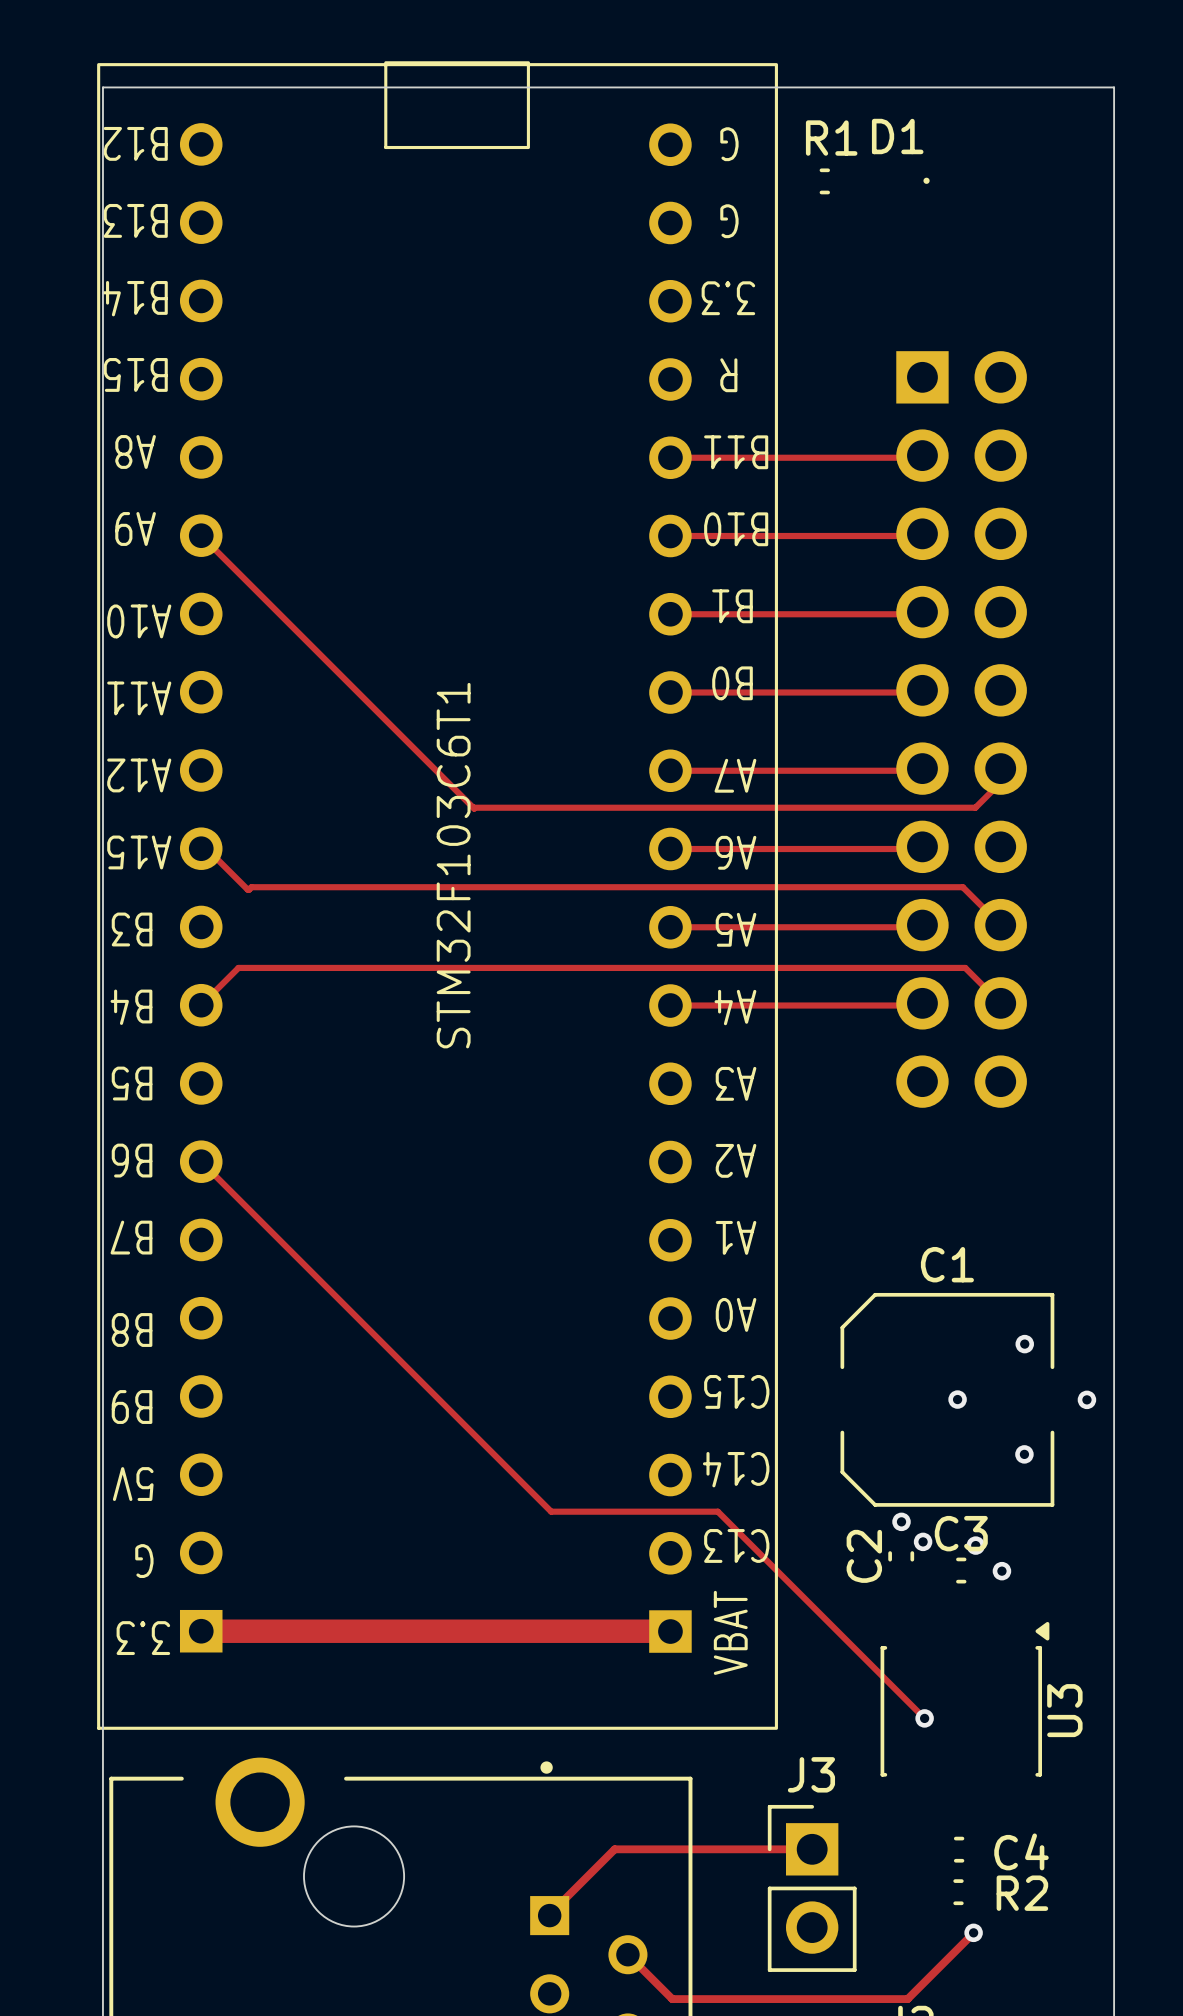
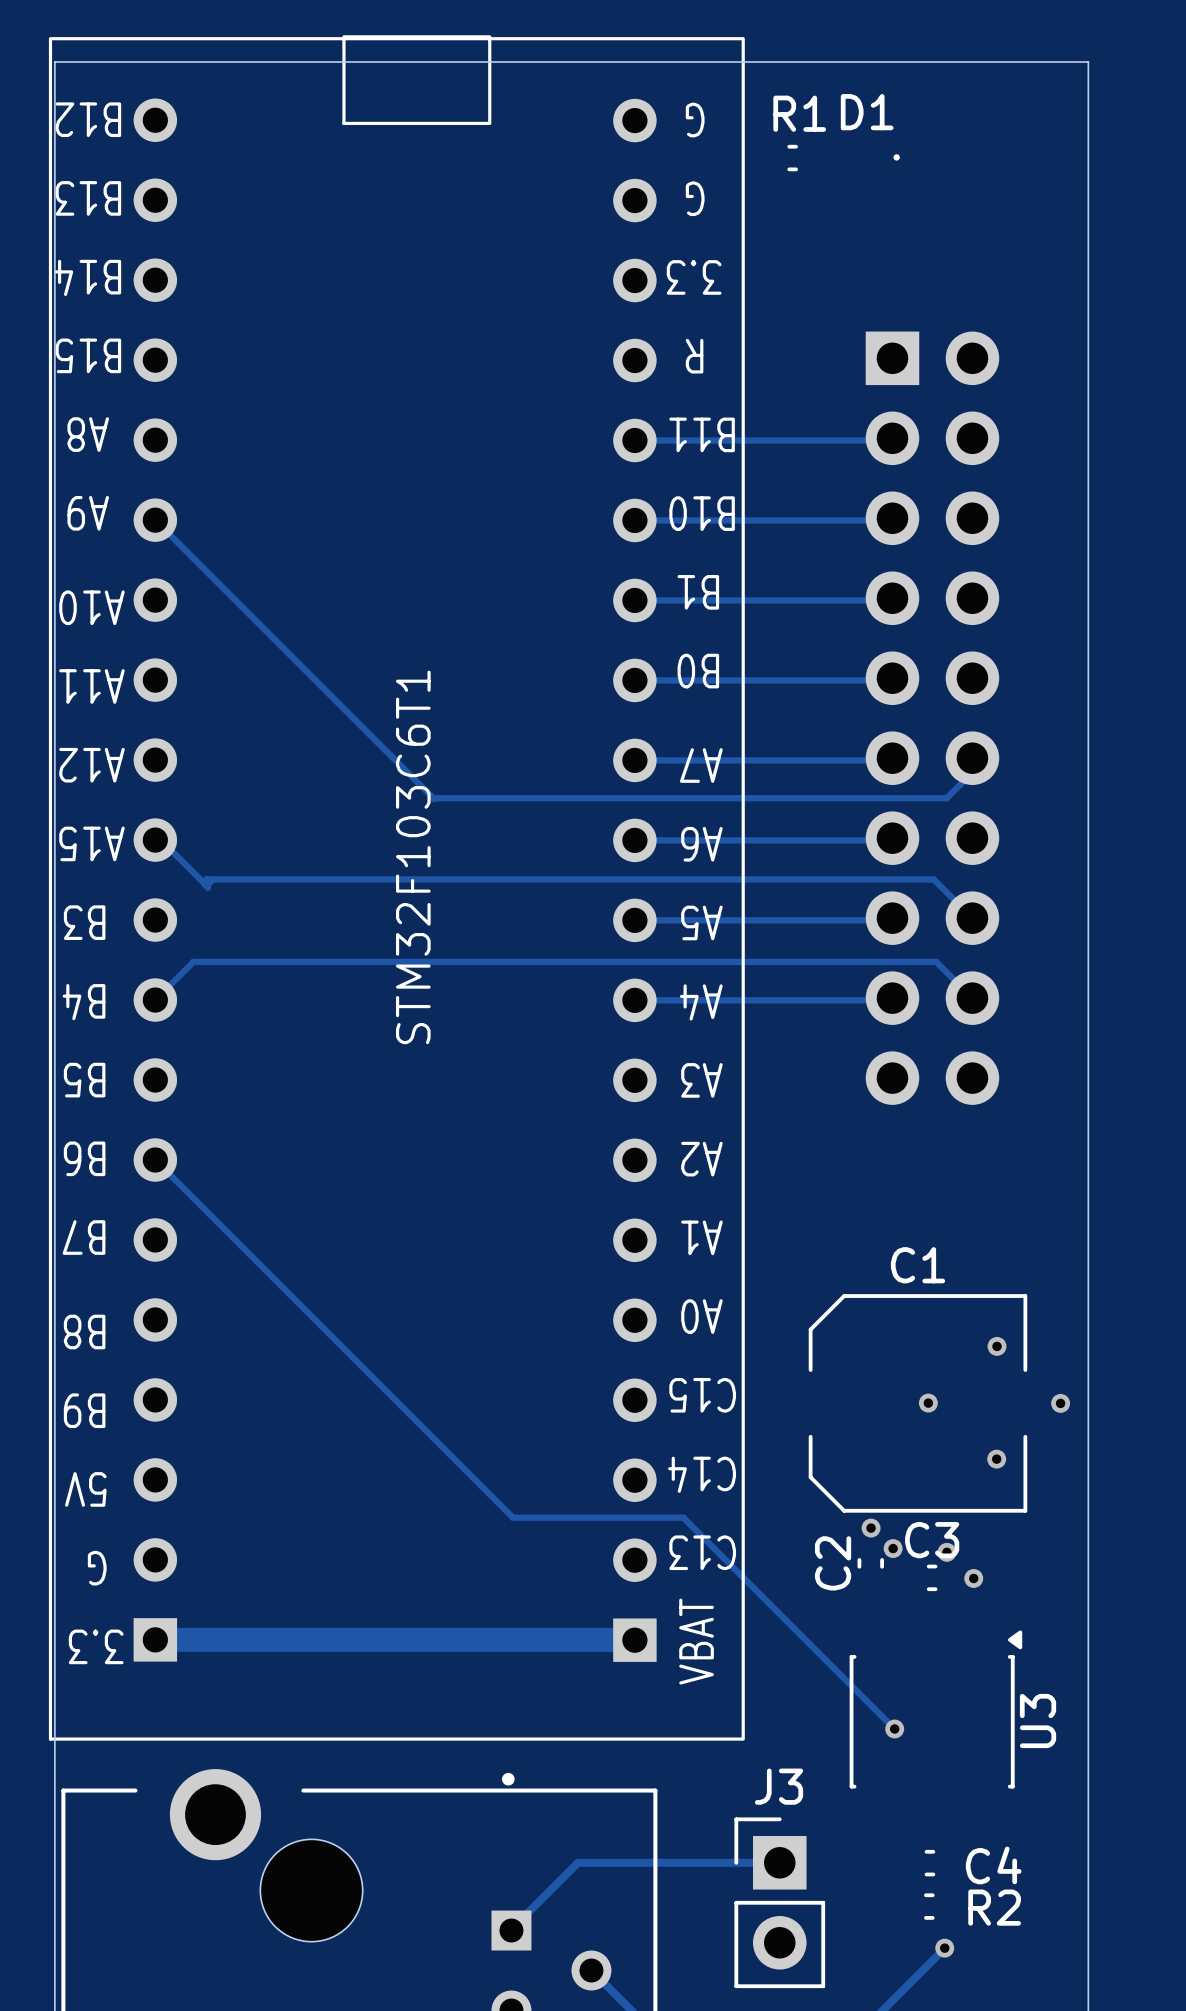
track: none -> (212, 879) (207, 884) (207, 887) (204, 881)

